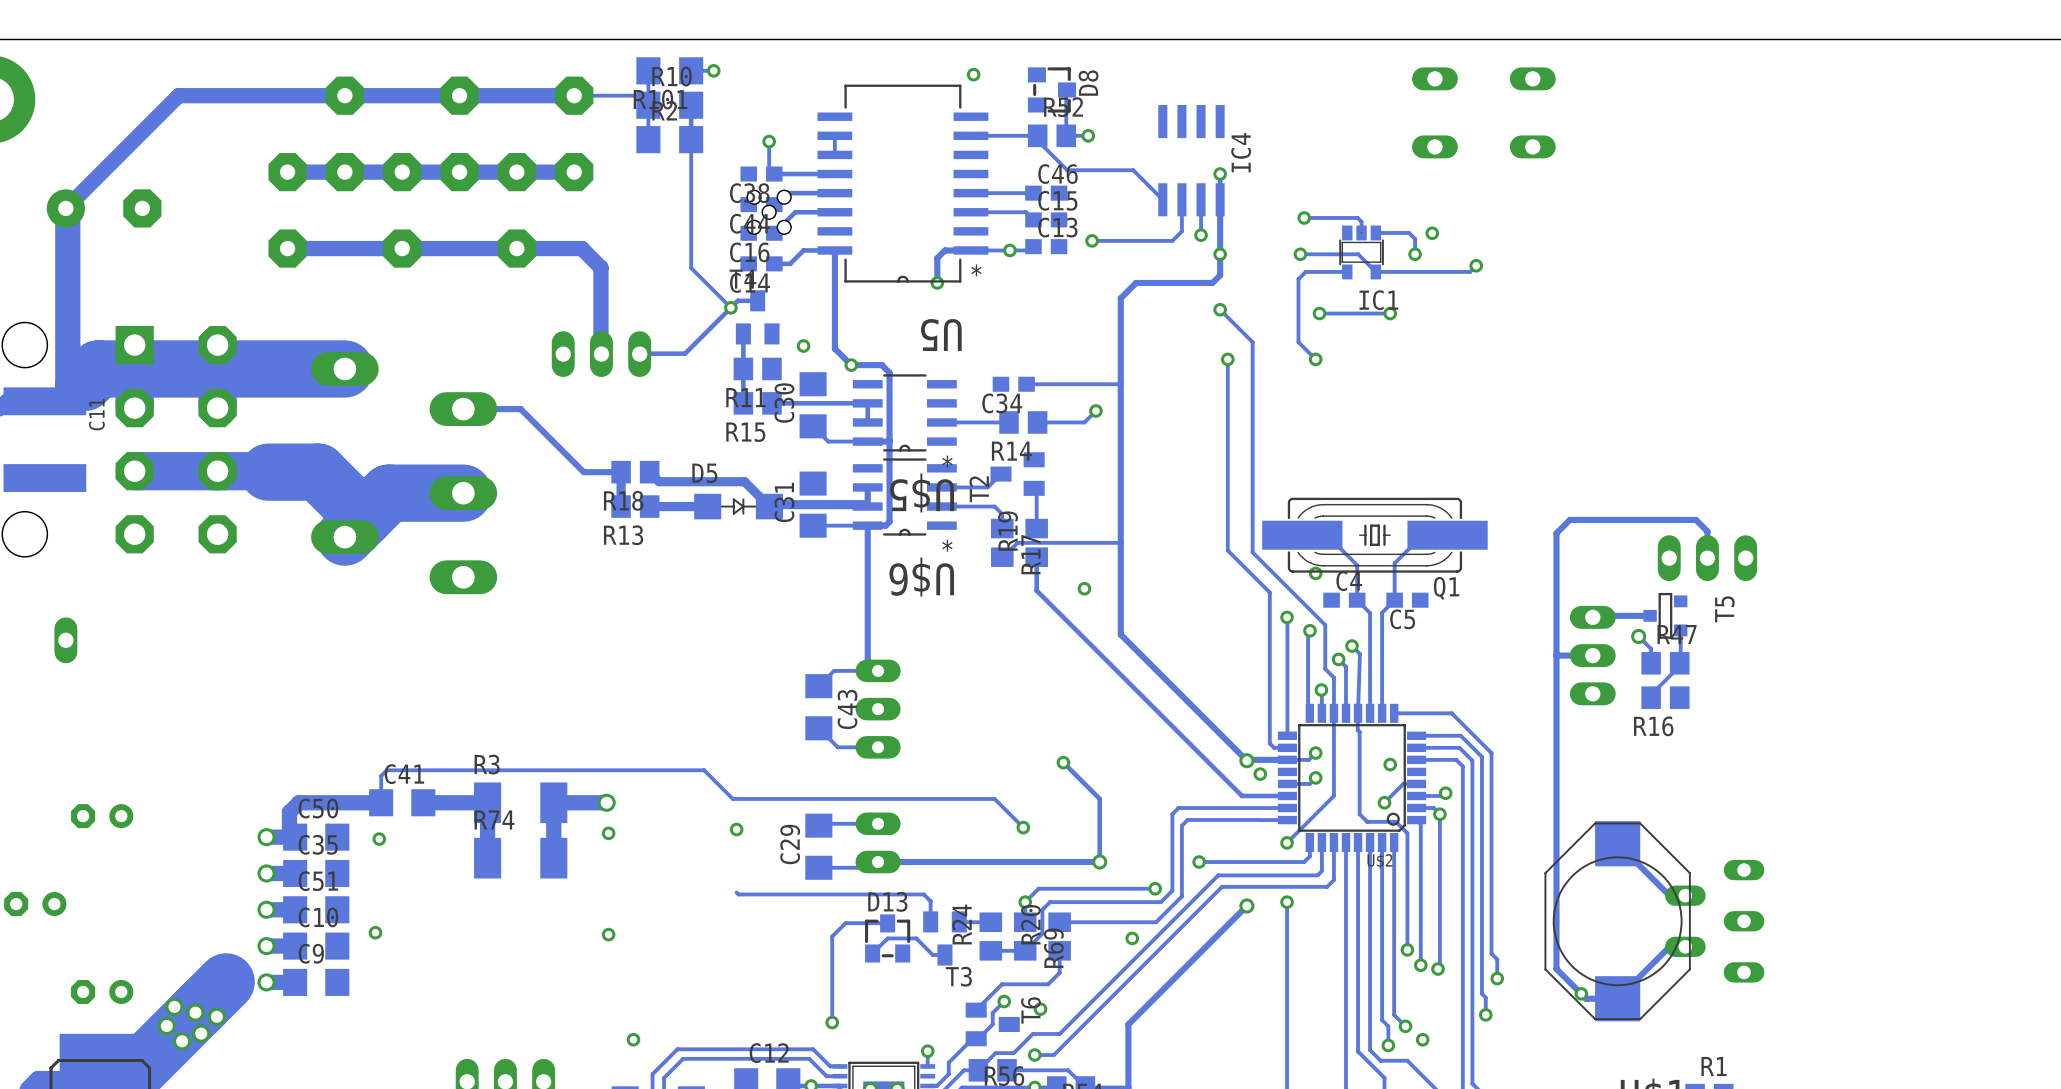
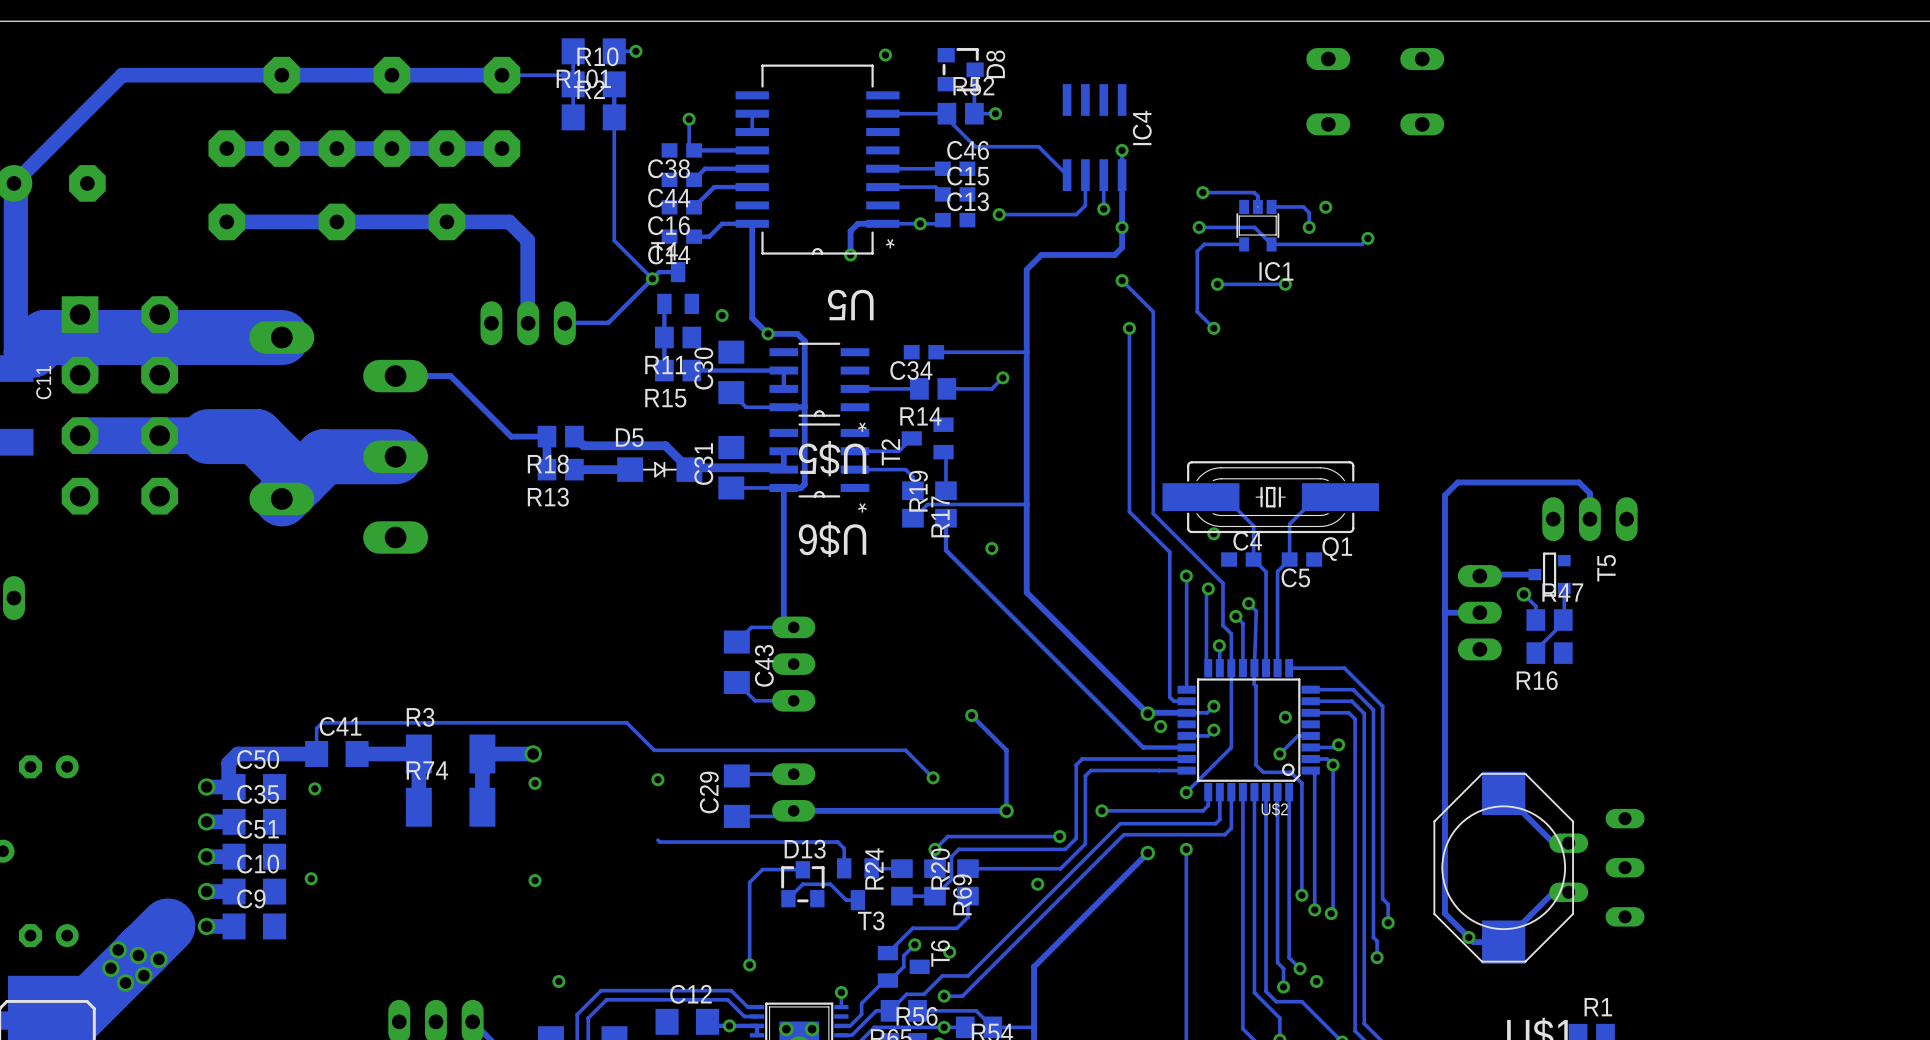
part: (769, 212) -> none

